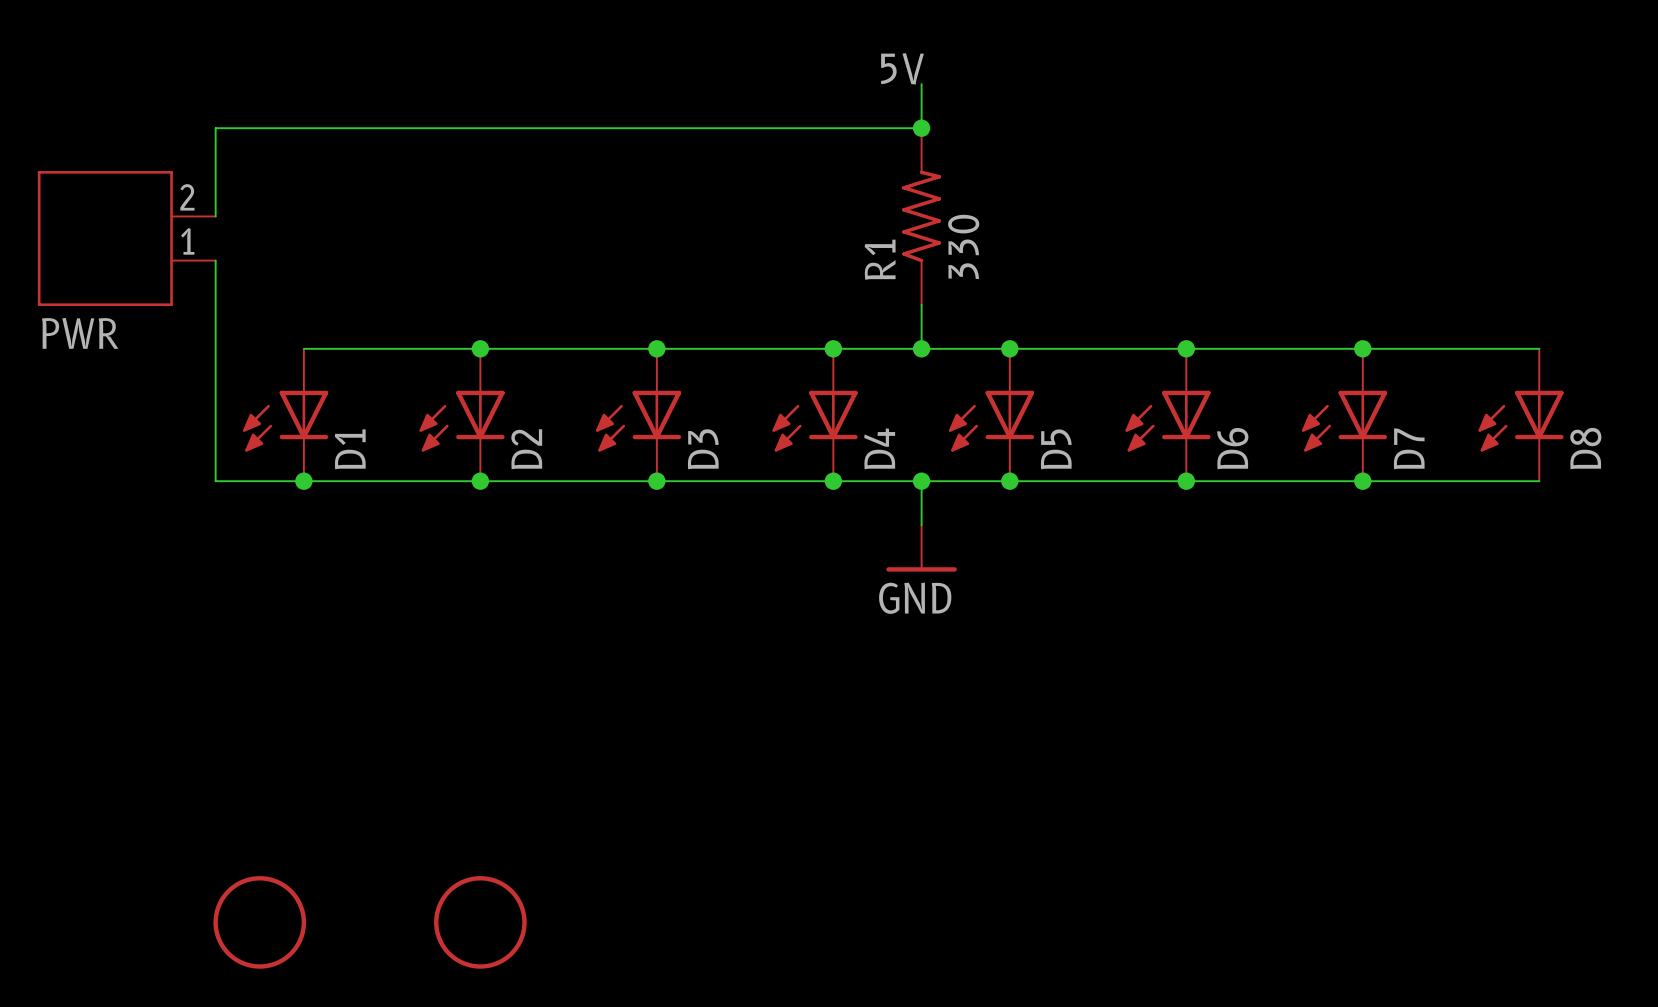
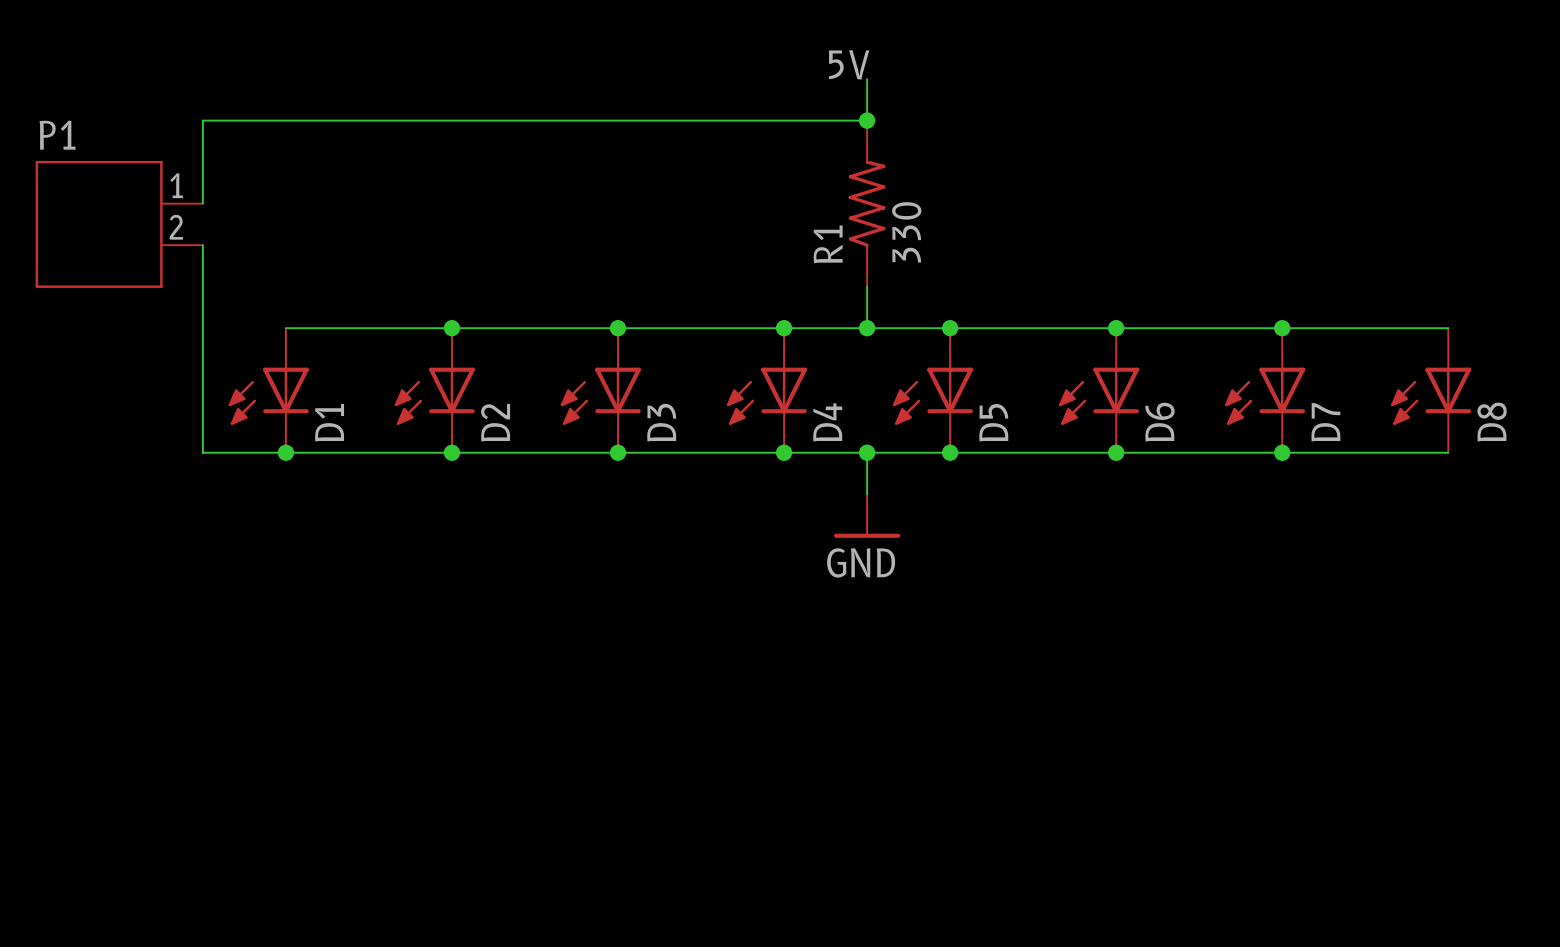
PWR flip: as is (105, 238) -> up-down (99, 224)
PWR name: PWR (80, 333) -> P1 (57, 135)
part: (259, 922) -> none
part: (480, 922) -> none

